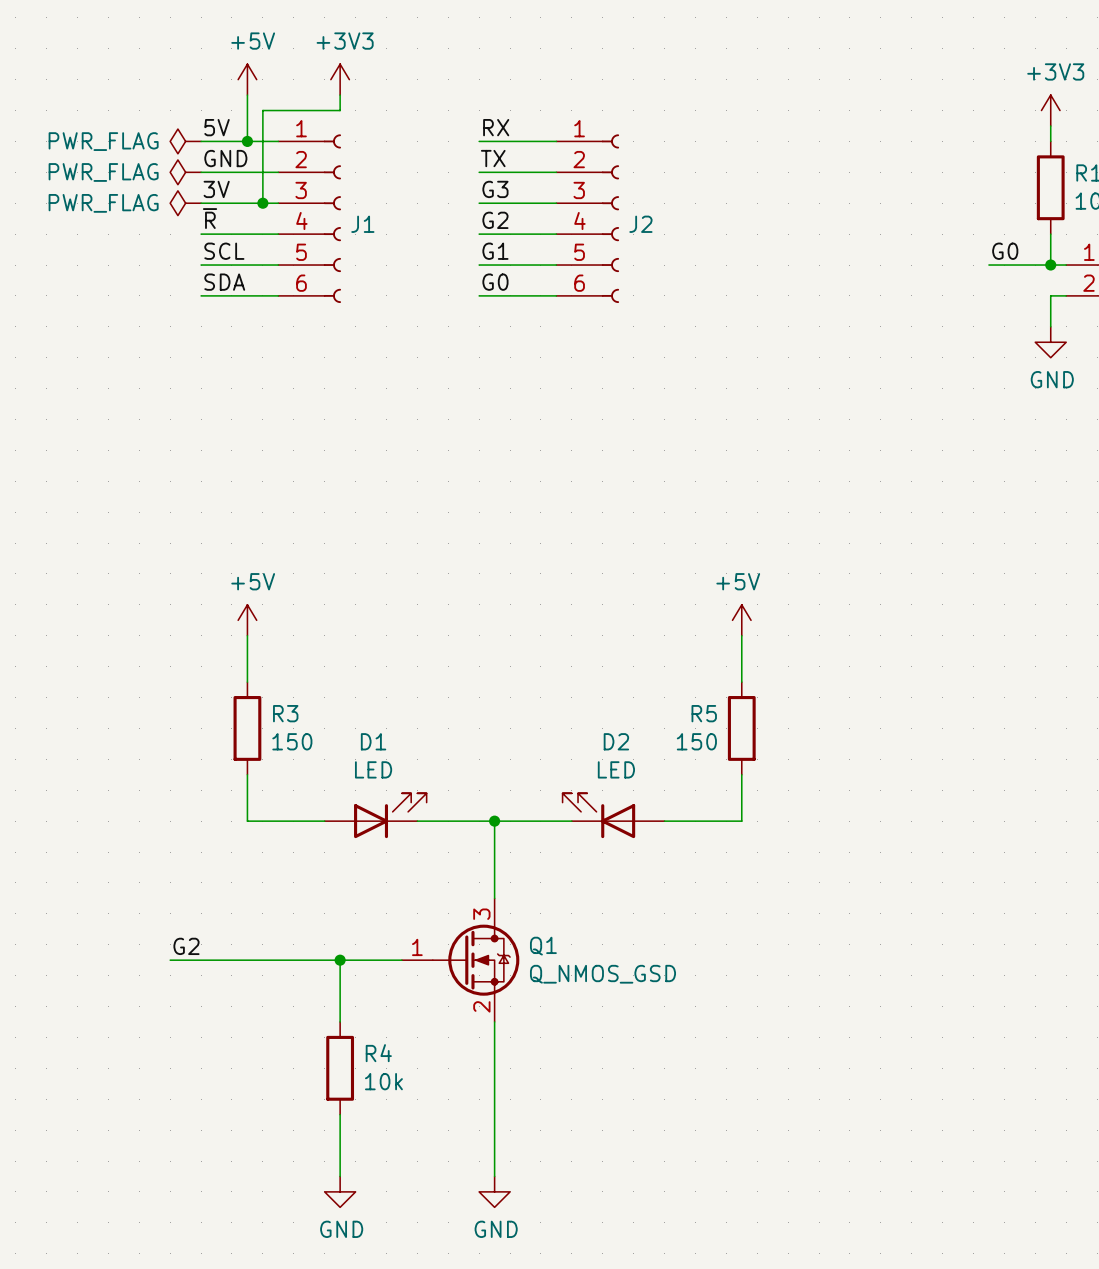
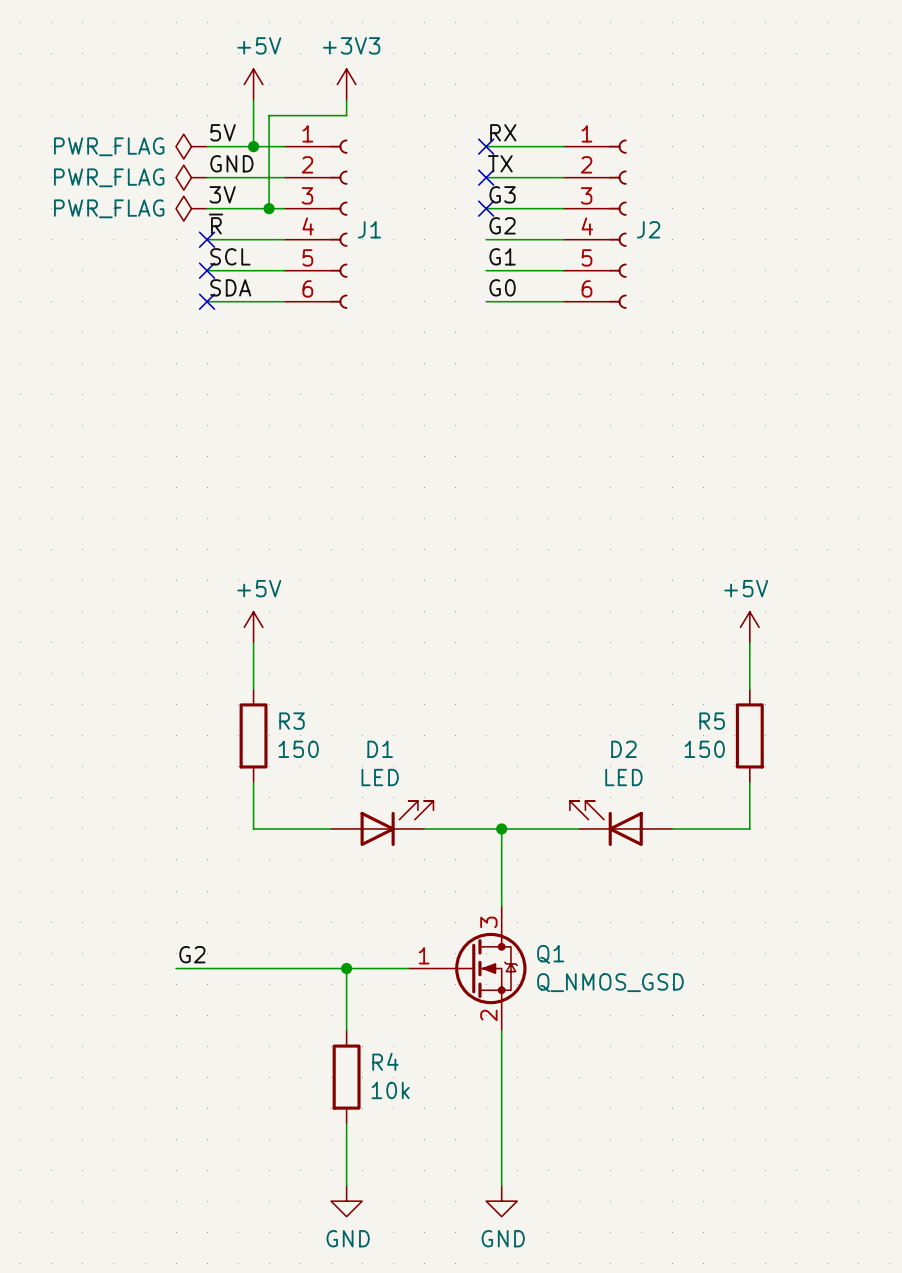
no-connect mark: none -> (486, 146)
no-connect mark: none -> (486, 177)
no-connect mark: none -> (486, 208)
no-connect mark: none -> (207, 239)
no-connect mark: none -> (207, 270)
no-connect mark: none -> (207, 301)

